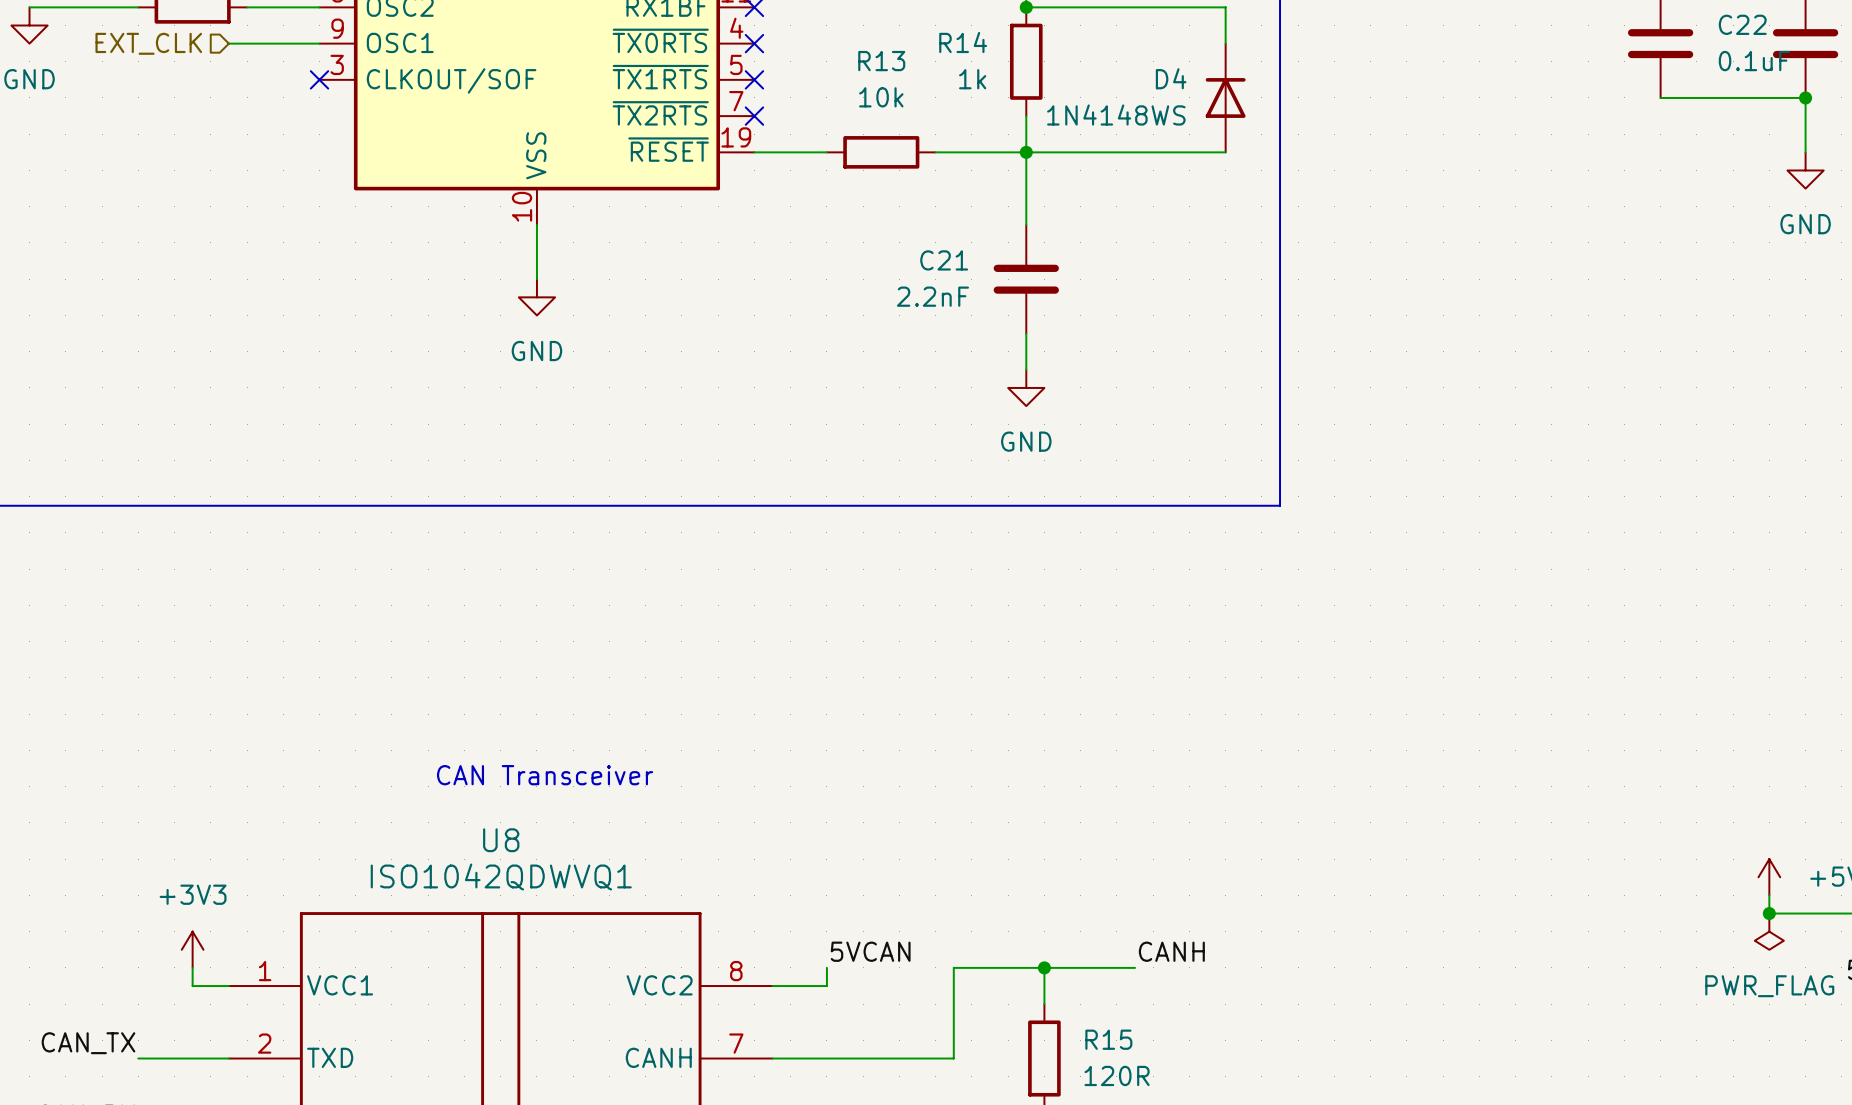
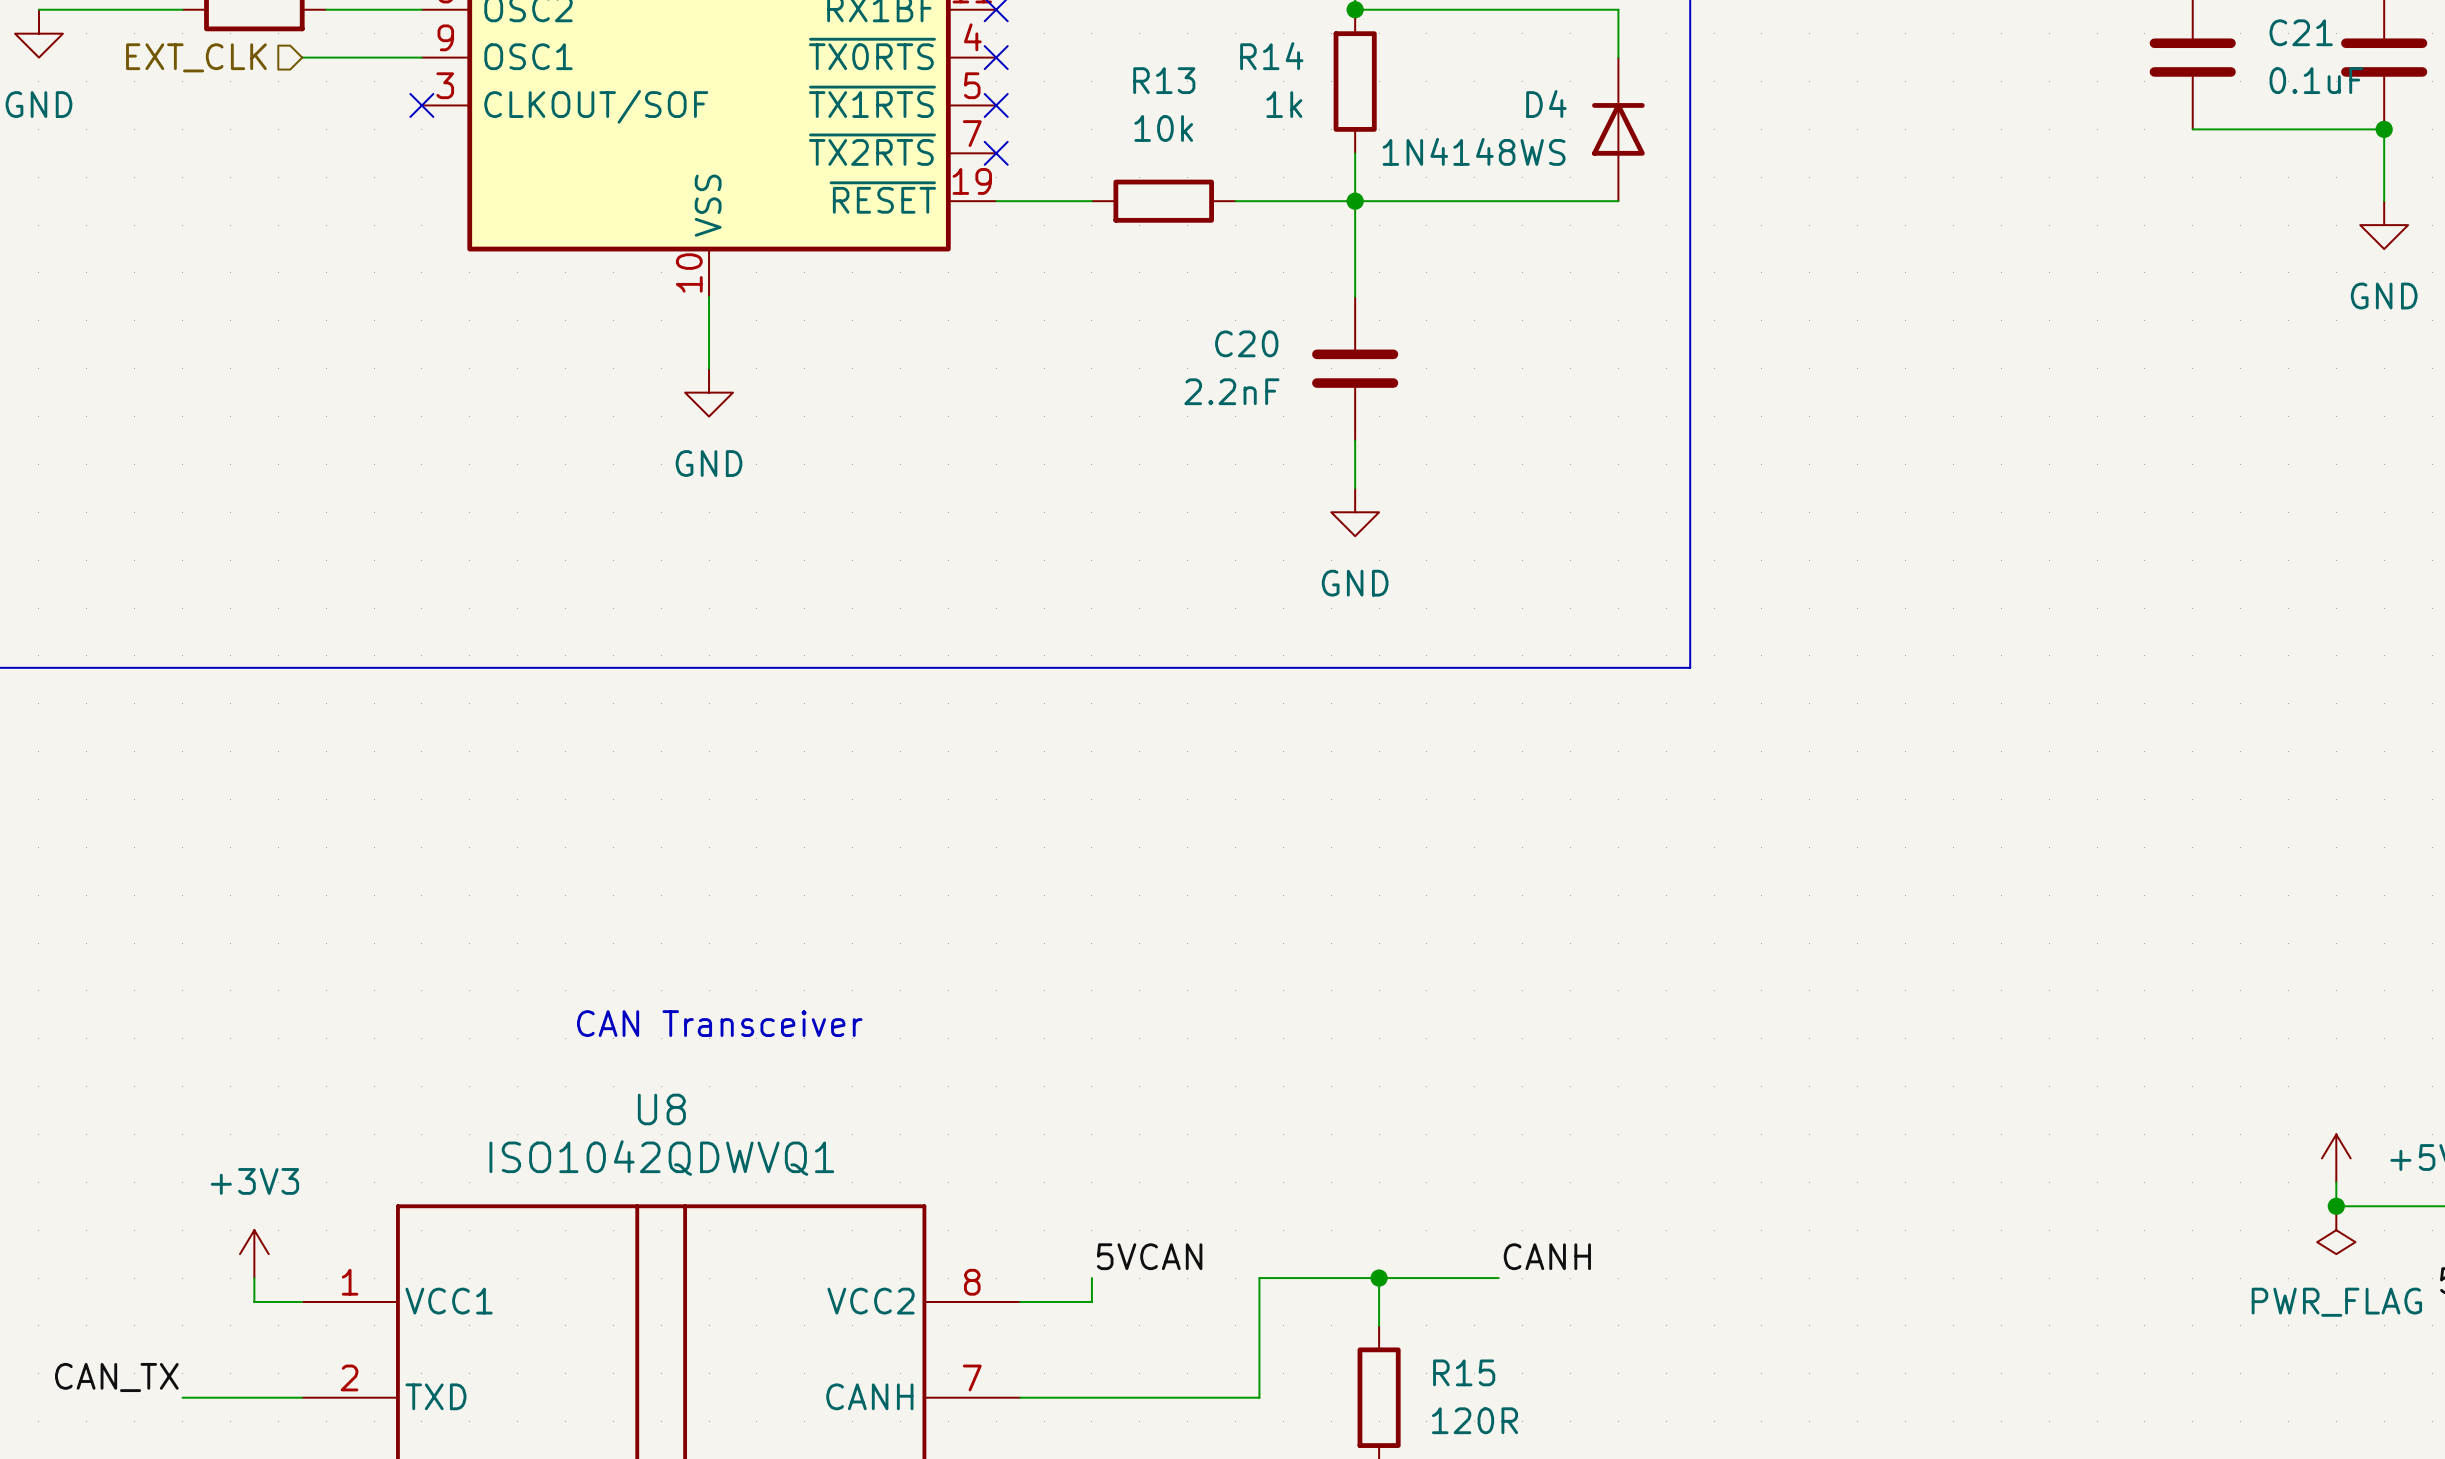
C22 name: C22 (1742, 24) -> C21 (2301, 32)
C21 name: C21 (944, 260) -> C20 (1246, 343)

